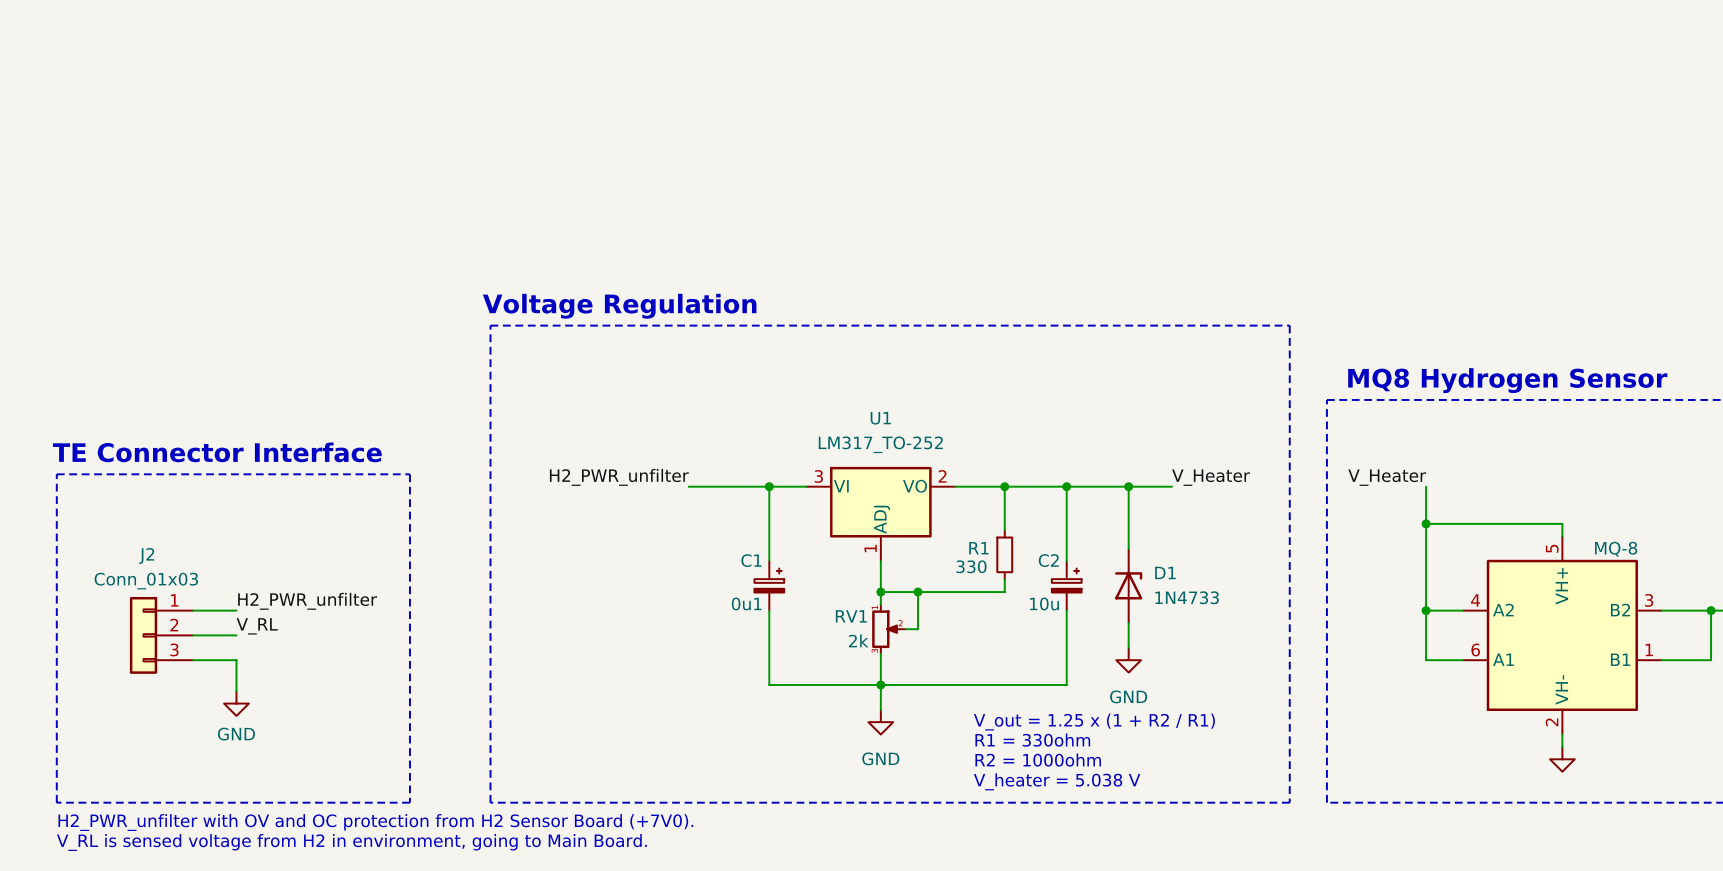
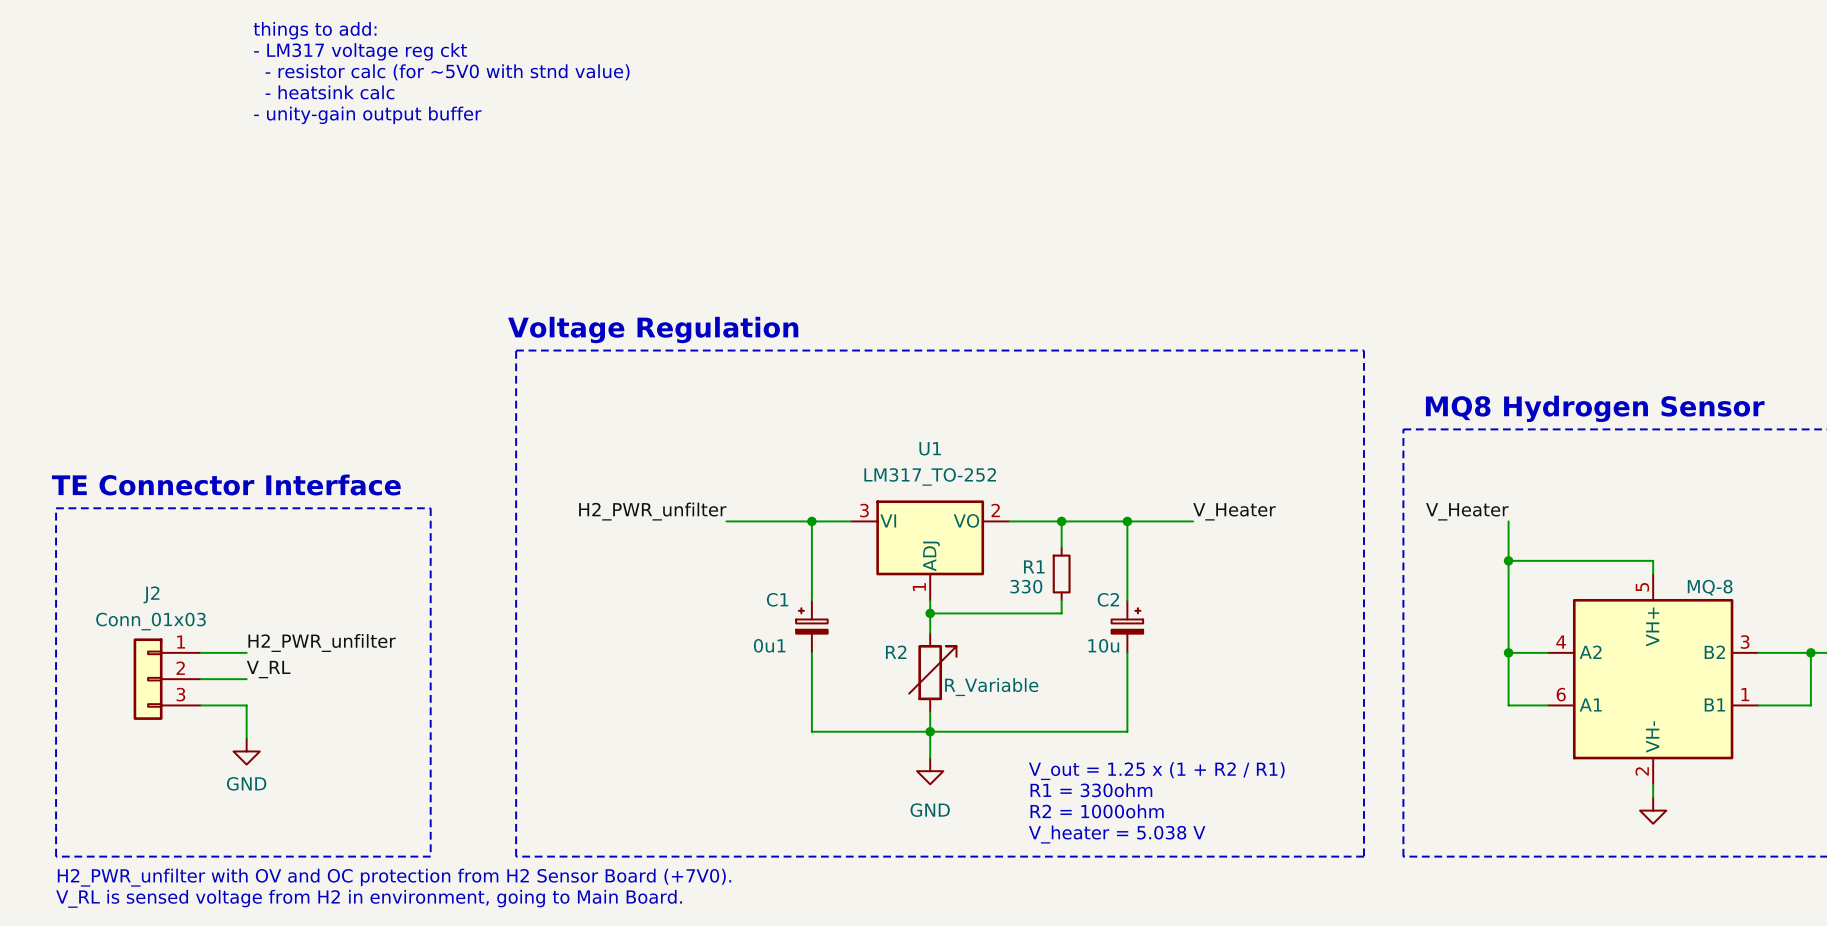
text: none -> things to add: (315, 30)
text: none -> - LM317 voltage reg ckt (360, 51)
text: none -> - resistor calc (for ~5V0 with stnd value) (447, 72)
text: none -> - heatsink calc (329, 92)
text: none -> - unity-gain output buffer (367, 115)
label position: V_Heater (1211, 477) -> V_Heater (1234, 511)
junction: (1128, 486) -> none
wire: (1172, 486) (1128, 486) (1128, 548) -> none
wire: (1004, 511) (1004, 530) -> none
R1 position: (1004, 554) -> (1061, 574)
wire: none -> (1061, 600) (1061, 613) (930, 613)
wire: (1004, 579) (1004, 592) (880, 592) (880, 604) -> none
C1 flip: as is (769, 580) -> left-right (811, 620)
D1: 1N4733 (1128, 585) -> none
junction position: (880, 592) -> (930, 613)
wire: (918, 592) (918, 629) (905, 629) -> none
junction: (918, 592) -> none
wire: (1128, 623) (1128, 647) -> none
R2: none -> R_Variable (932, 672)
RV1: 2k (888, 629) -> none
power symbol: GND (1128, 660) -> none

